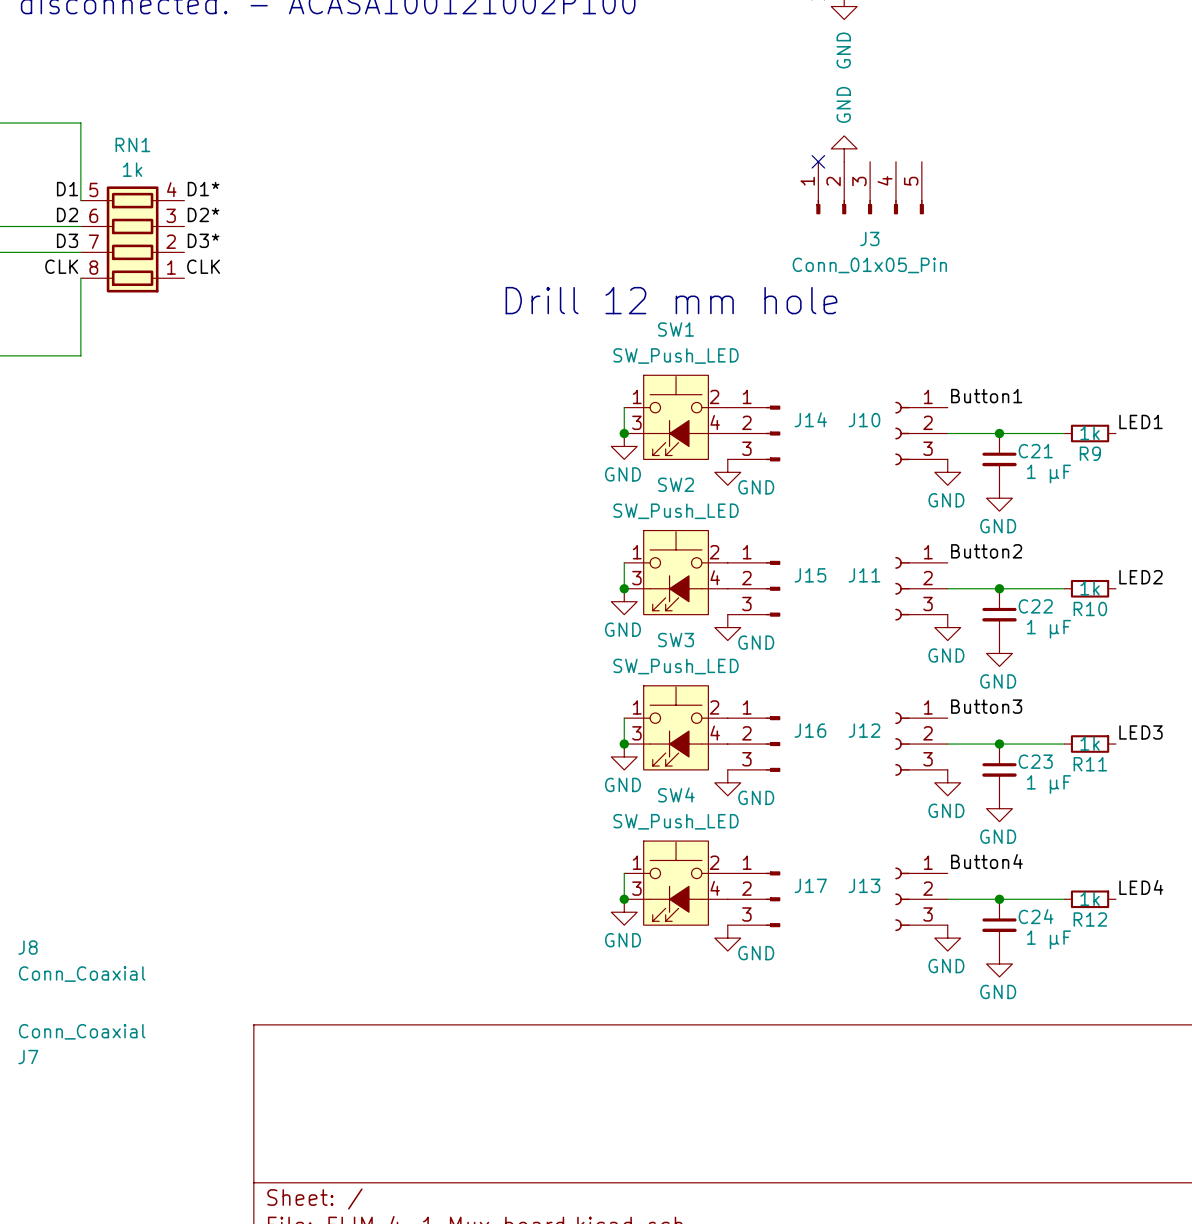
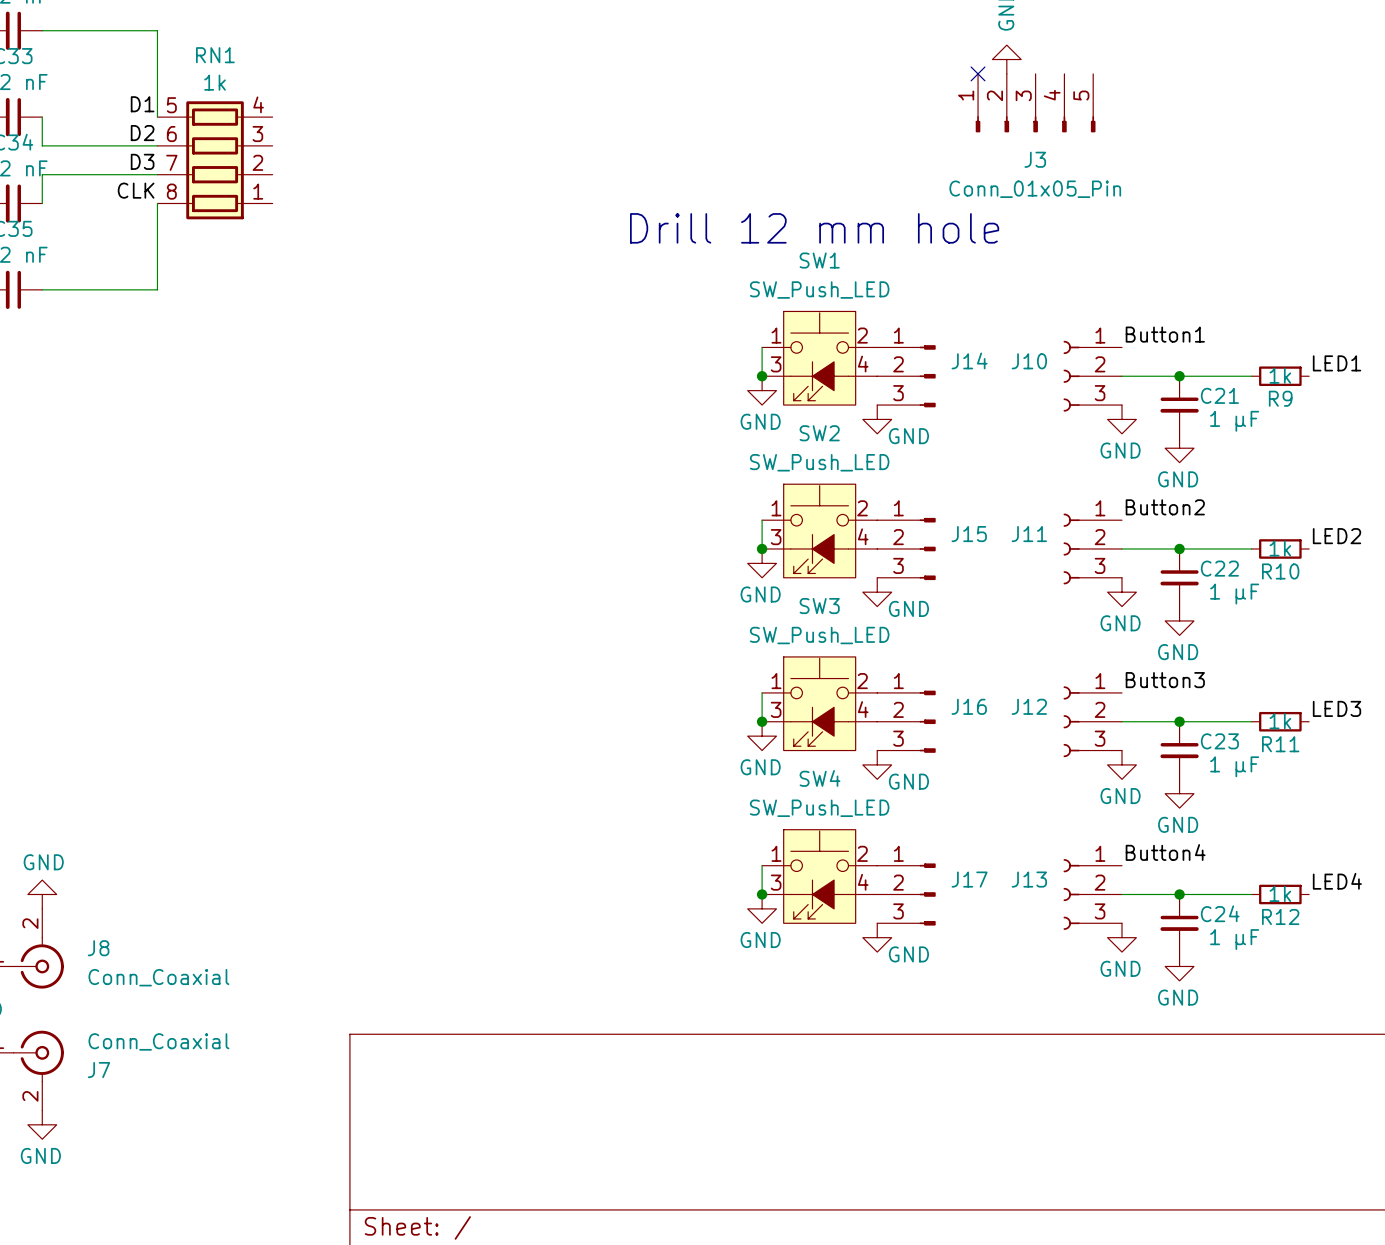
label: D1* (203, 189) -> none
label: D2* (203, 214) -> none
label: D3* (203, 240) -> none
label: CLK (203, 266) -> none

